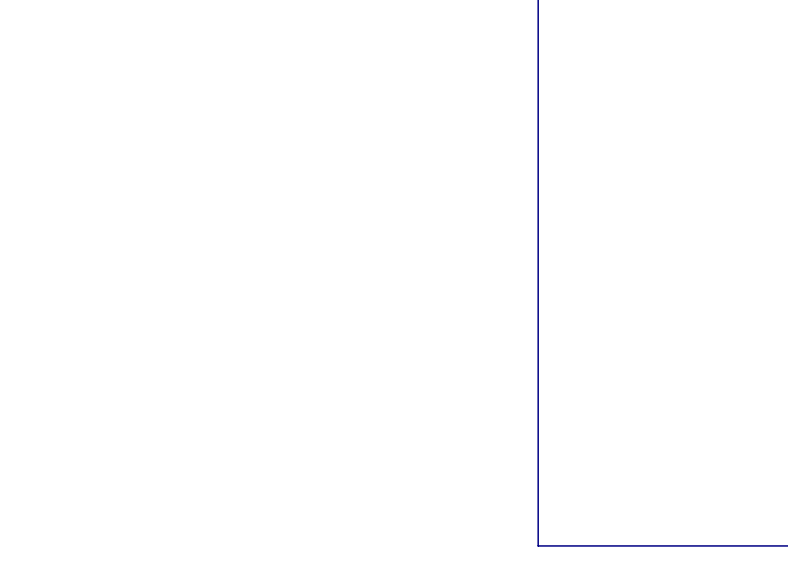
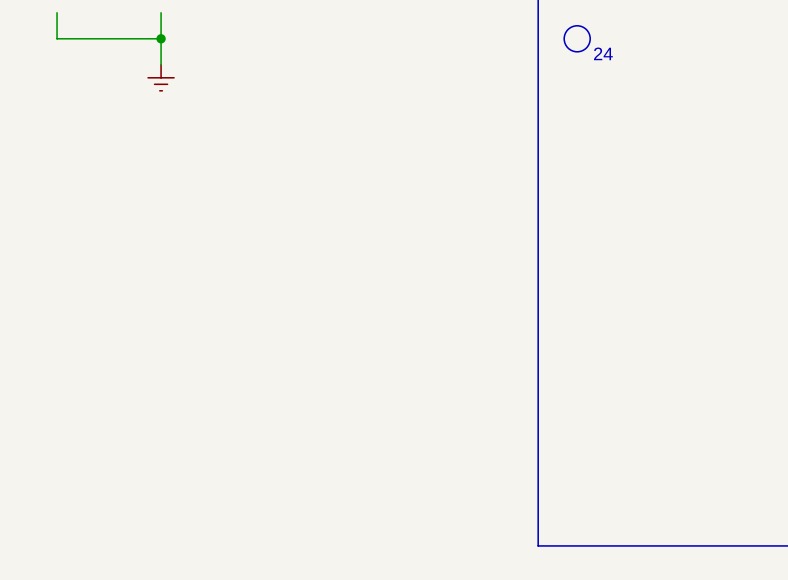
wire: none -> (57, 12) (57, 38) (161, 38)
wire: none -> (161, 12) (161, 64)
drawing: none -> [564, 25, 591, 52]
junction: none -> (161, 38)
text: none -> 24 (603, 53)
power symbol: none -> (161, 77)

